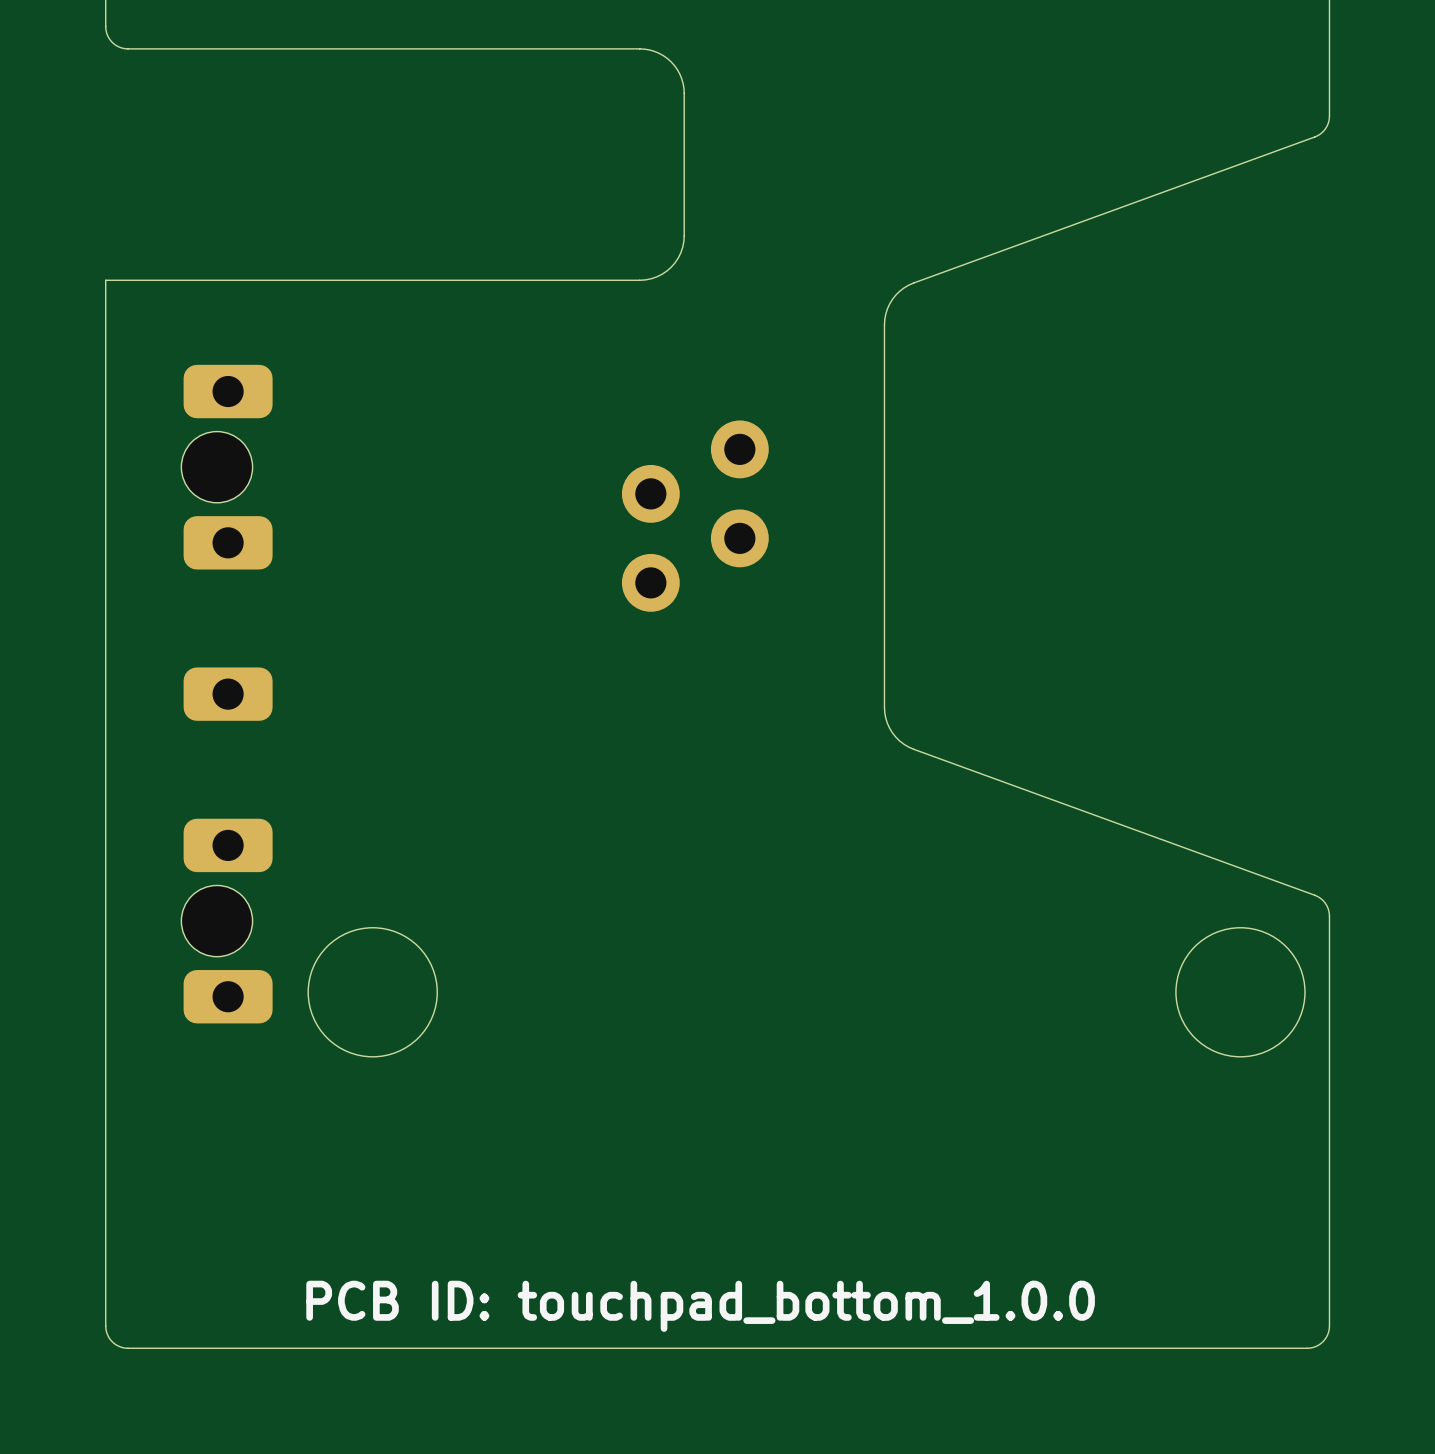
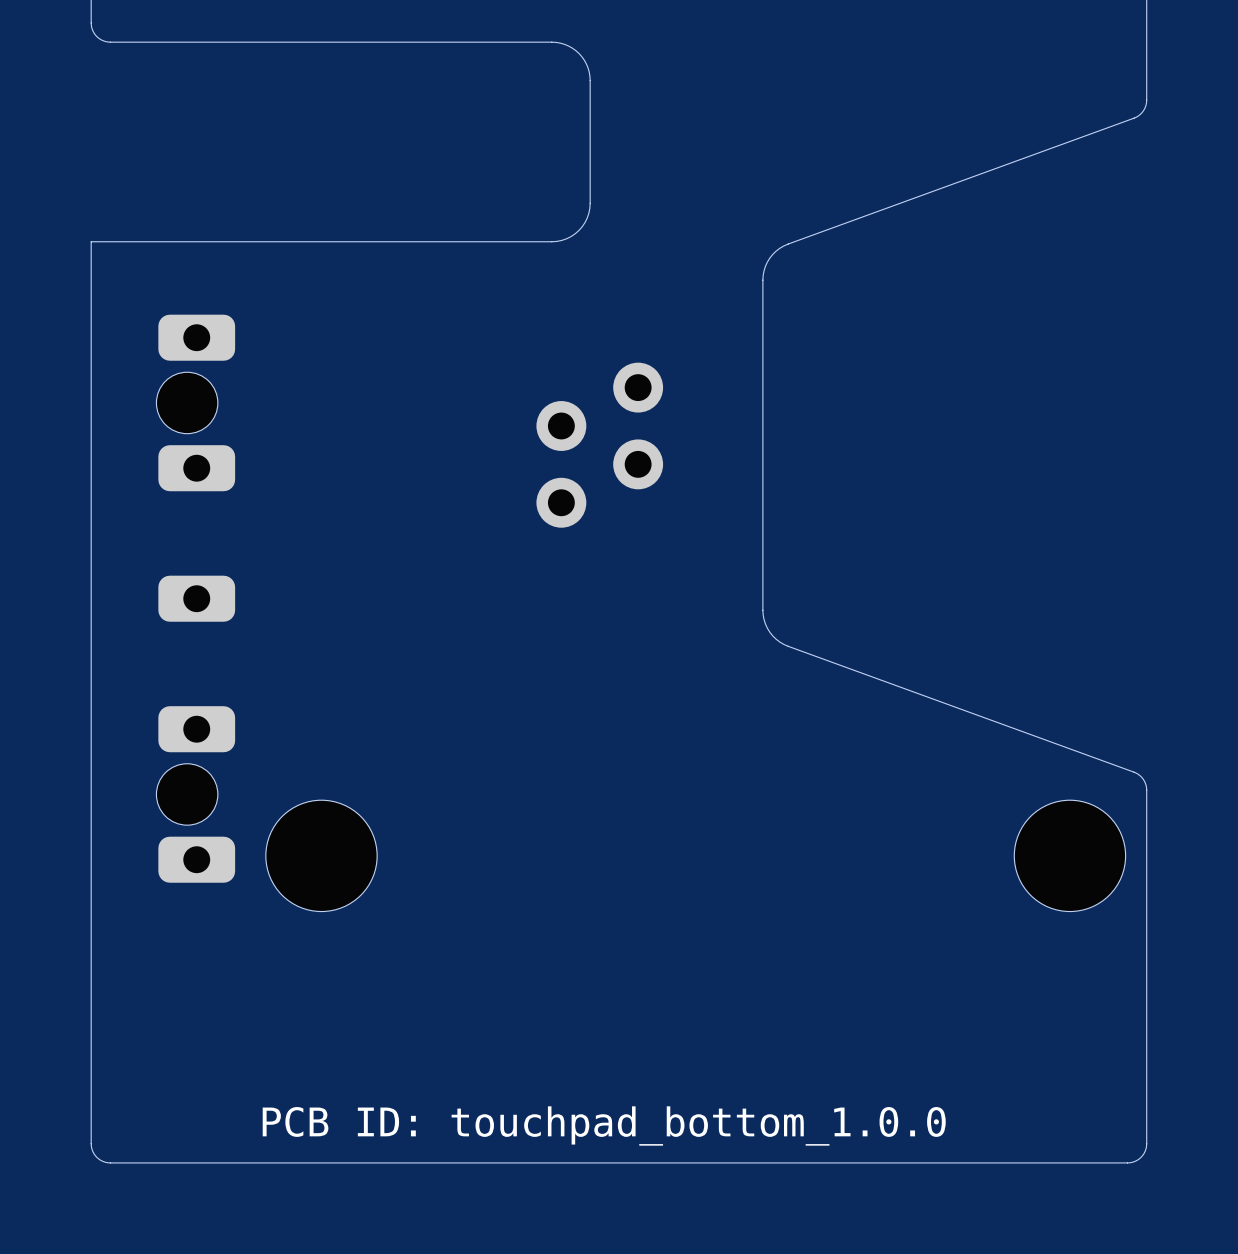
round board edge: [307, 927, 438, 1058] -> none
round board edge: [1175, 927, 1306, 1058] -> none
part: none -> (321, 855)
part: none -> (1069, 855)

